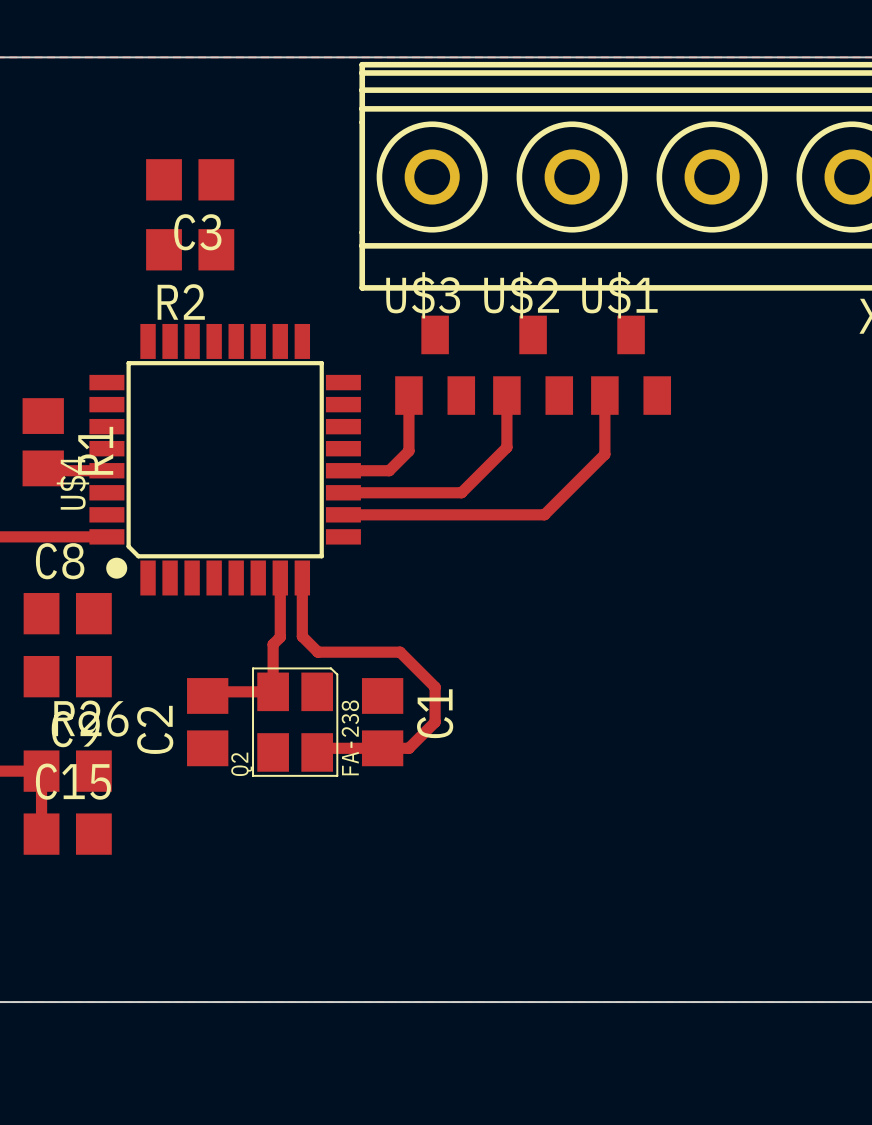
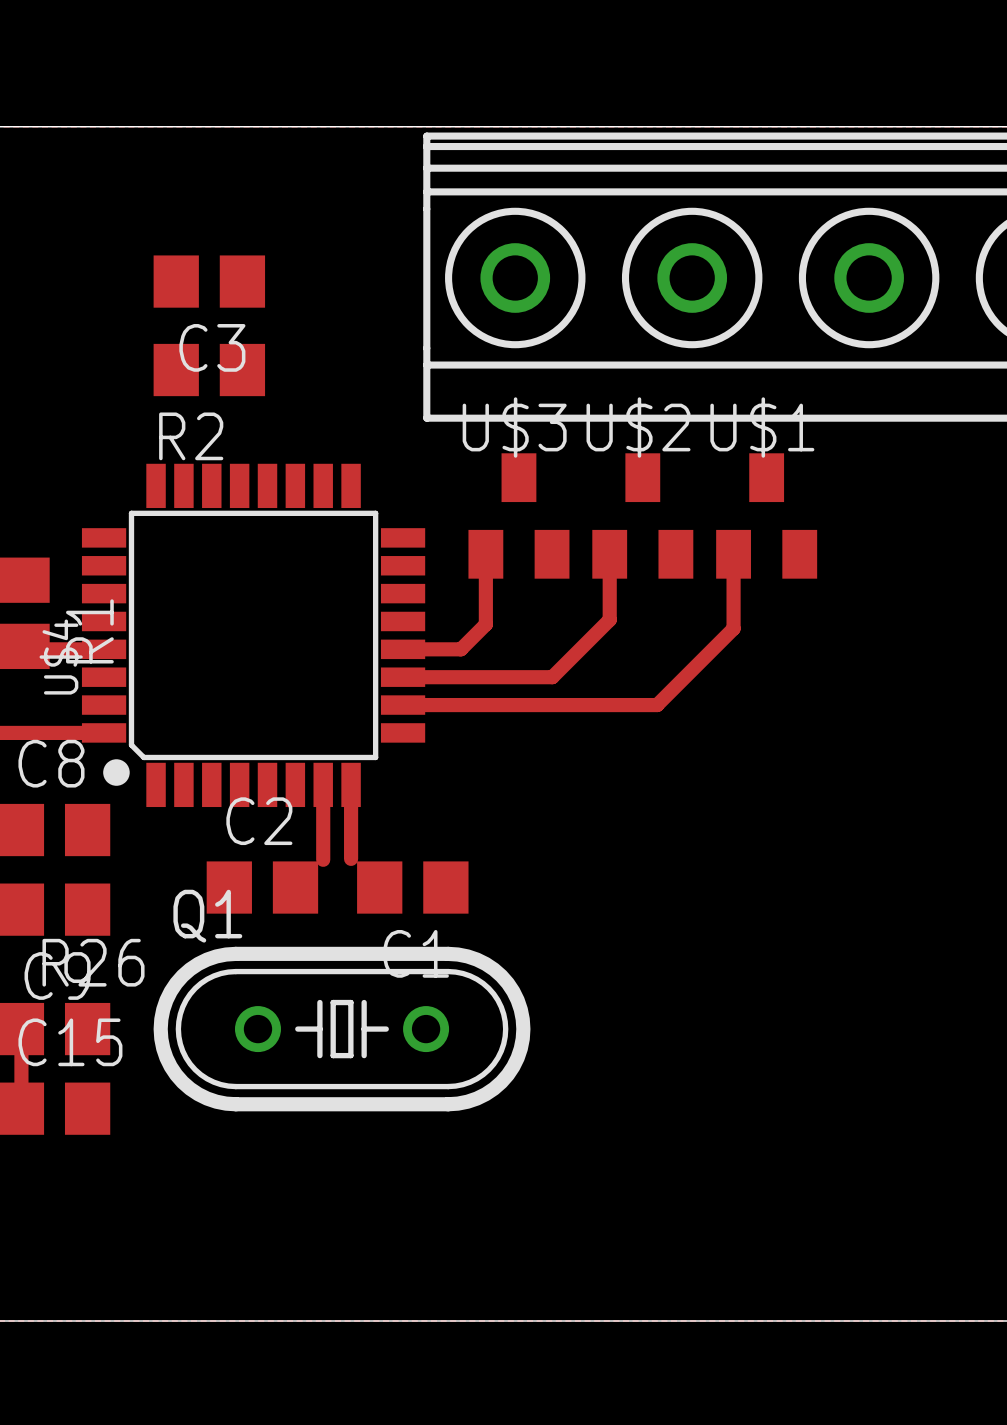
track: (302, 636) (317, 652) (400, 652) (435, 687) (435, 722) (408, 748) (321, 748) (317, 752) -> none
track: (280, 637) (273, 644) (273, 691) (207, 691) (207, 695) -> none
C2 rotation: 0° (207, 722) -> 90° clockwise (262, 887)
C2 position: (207, 722) -> (262, 887)
Q2: FA-238 (295, 722) -> none
C1 rotation: 0° (382, 722) -> 90° clockwise (412, 887)
C1 position: (382, 722) -> (412, 887)
Q1: none -> (342, 1029)

